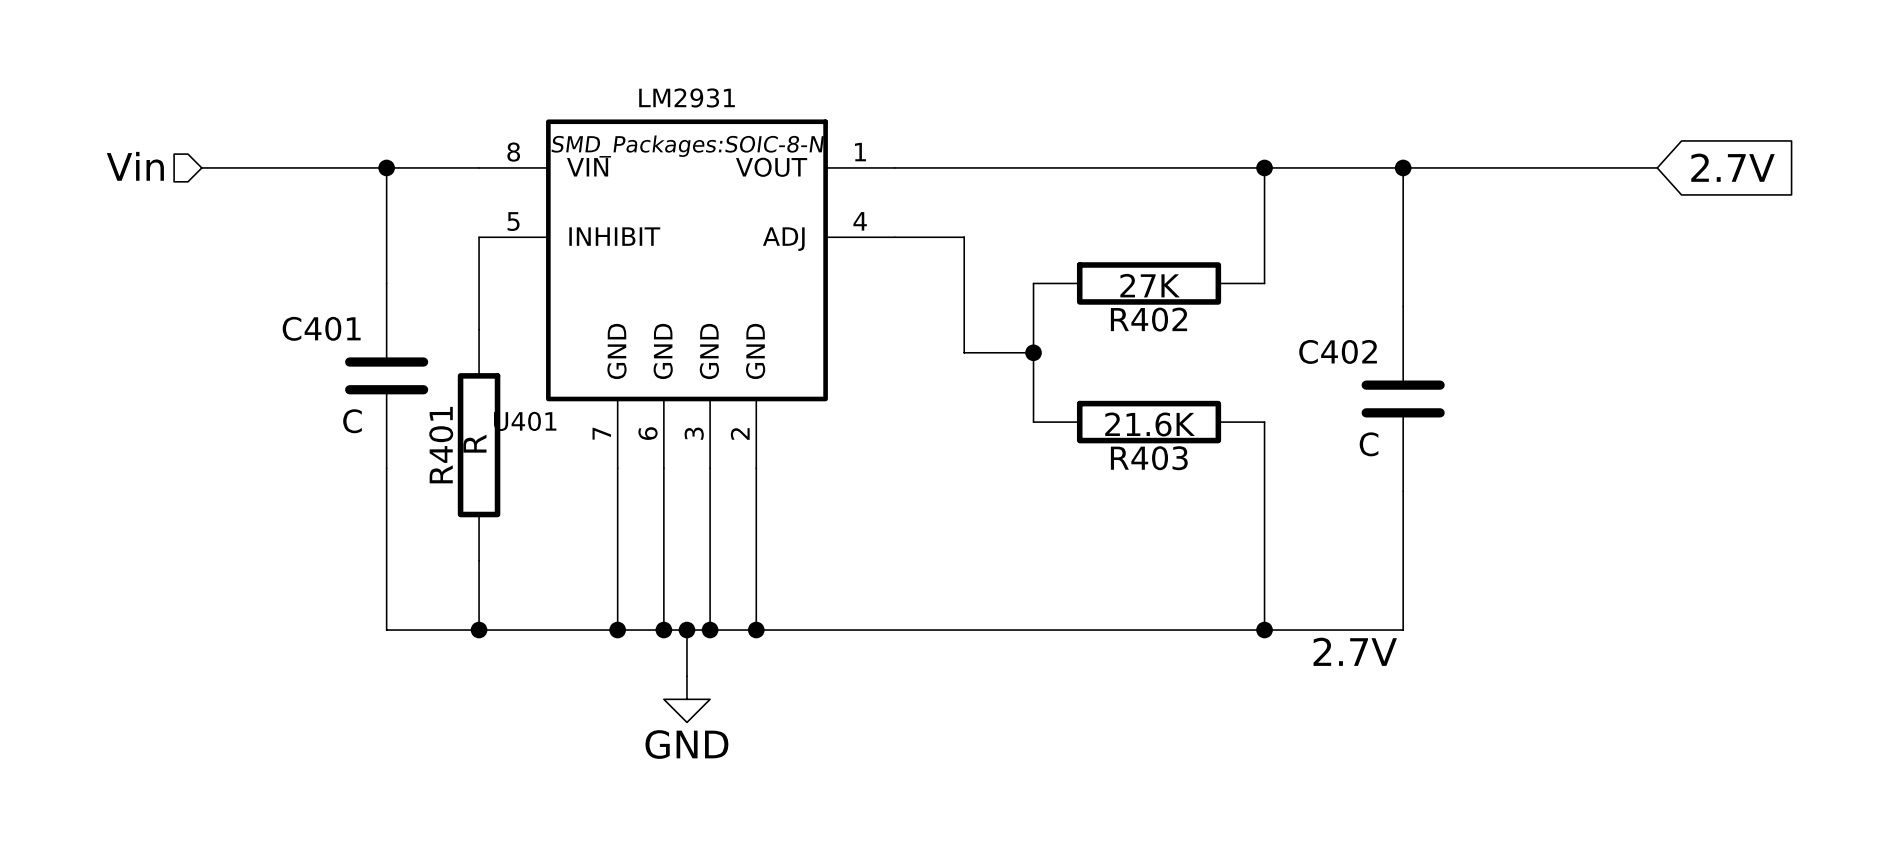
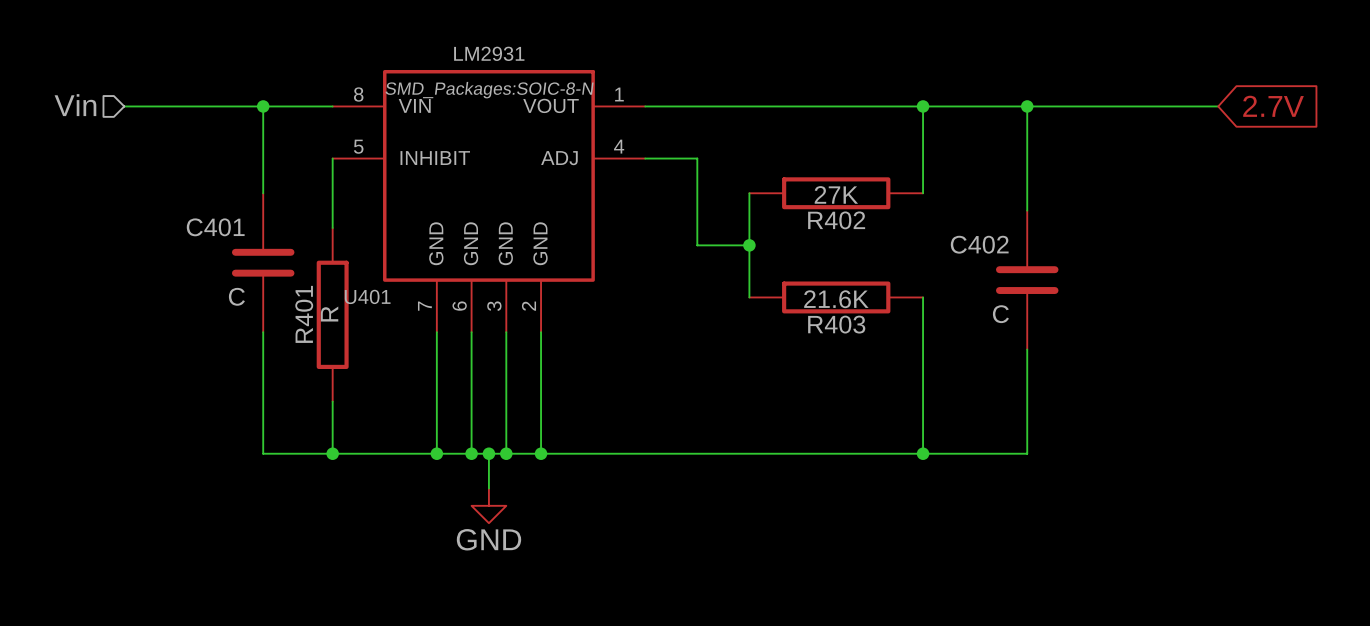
label: 2.7V (1355, 651) -> none

